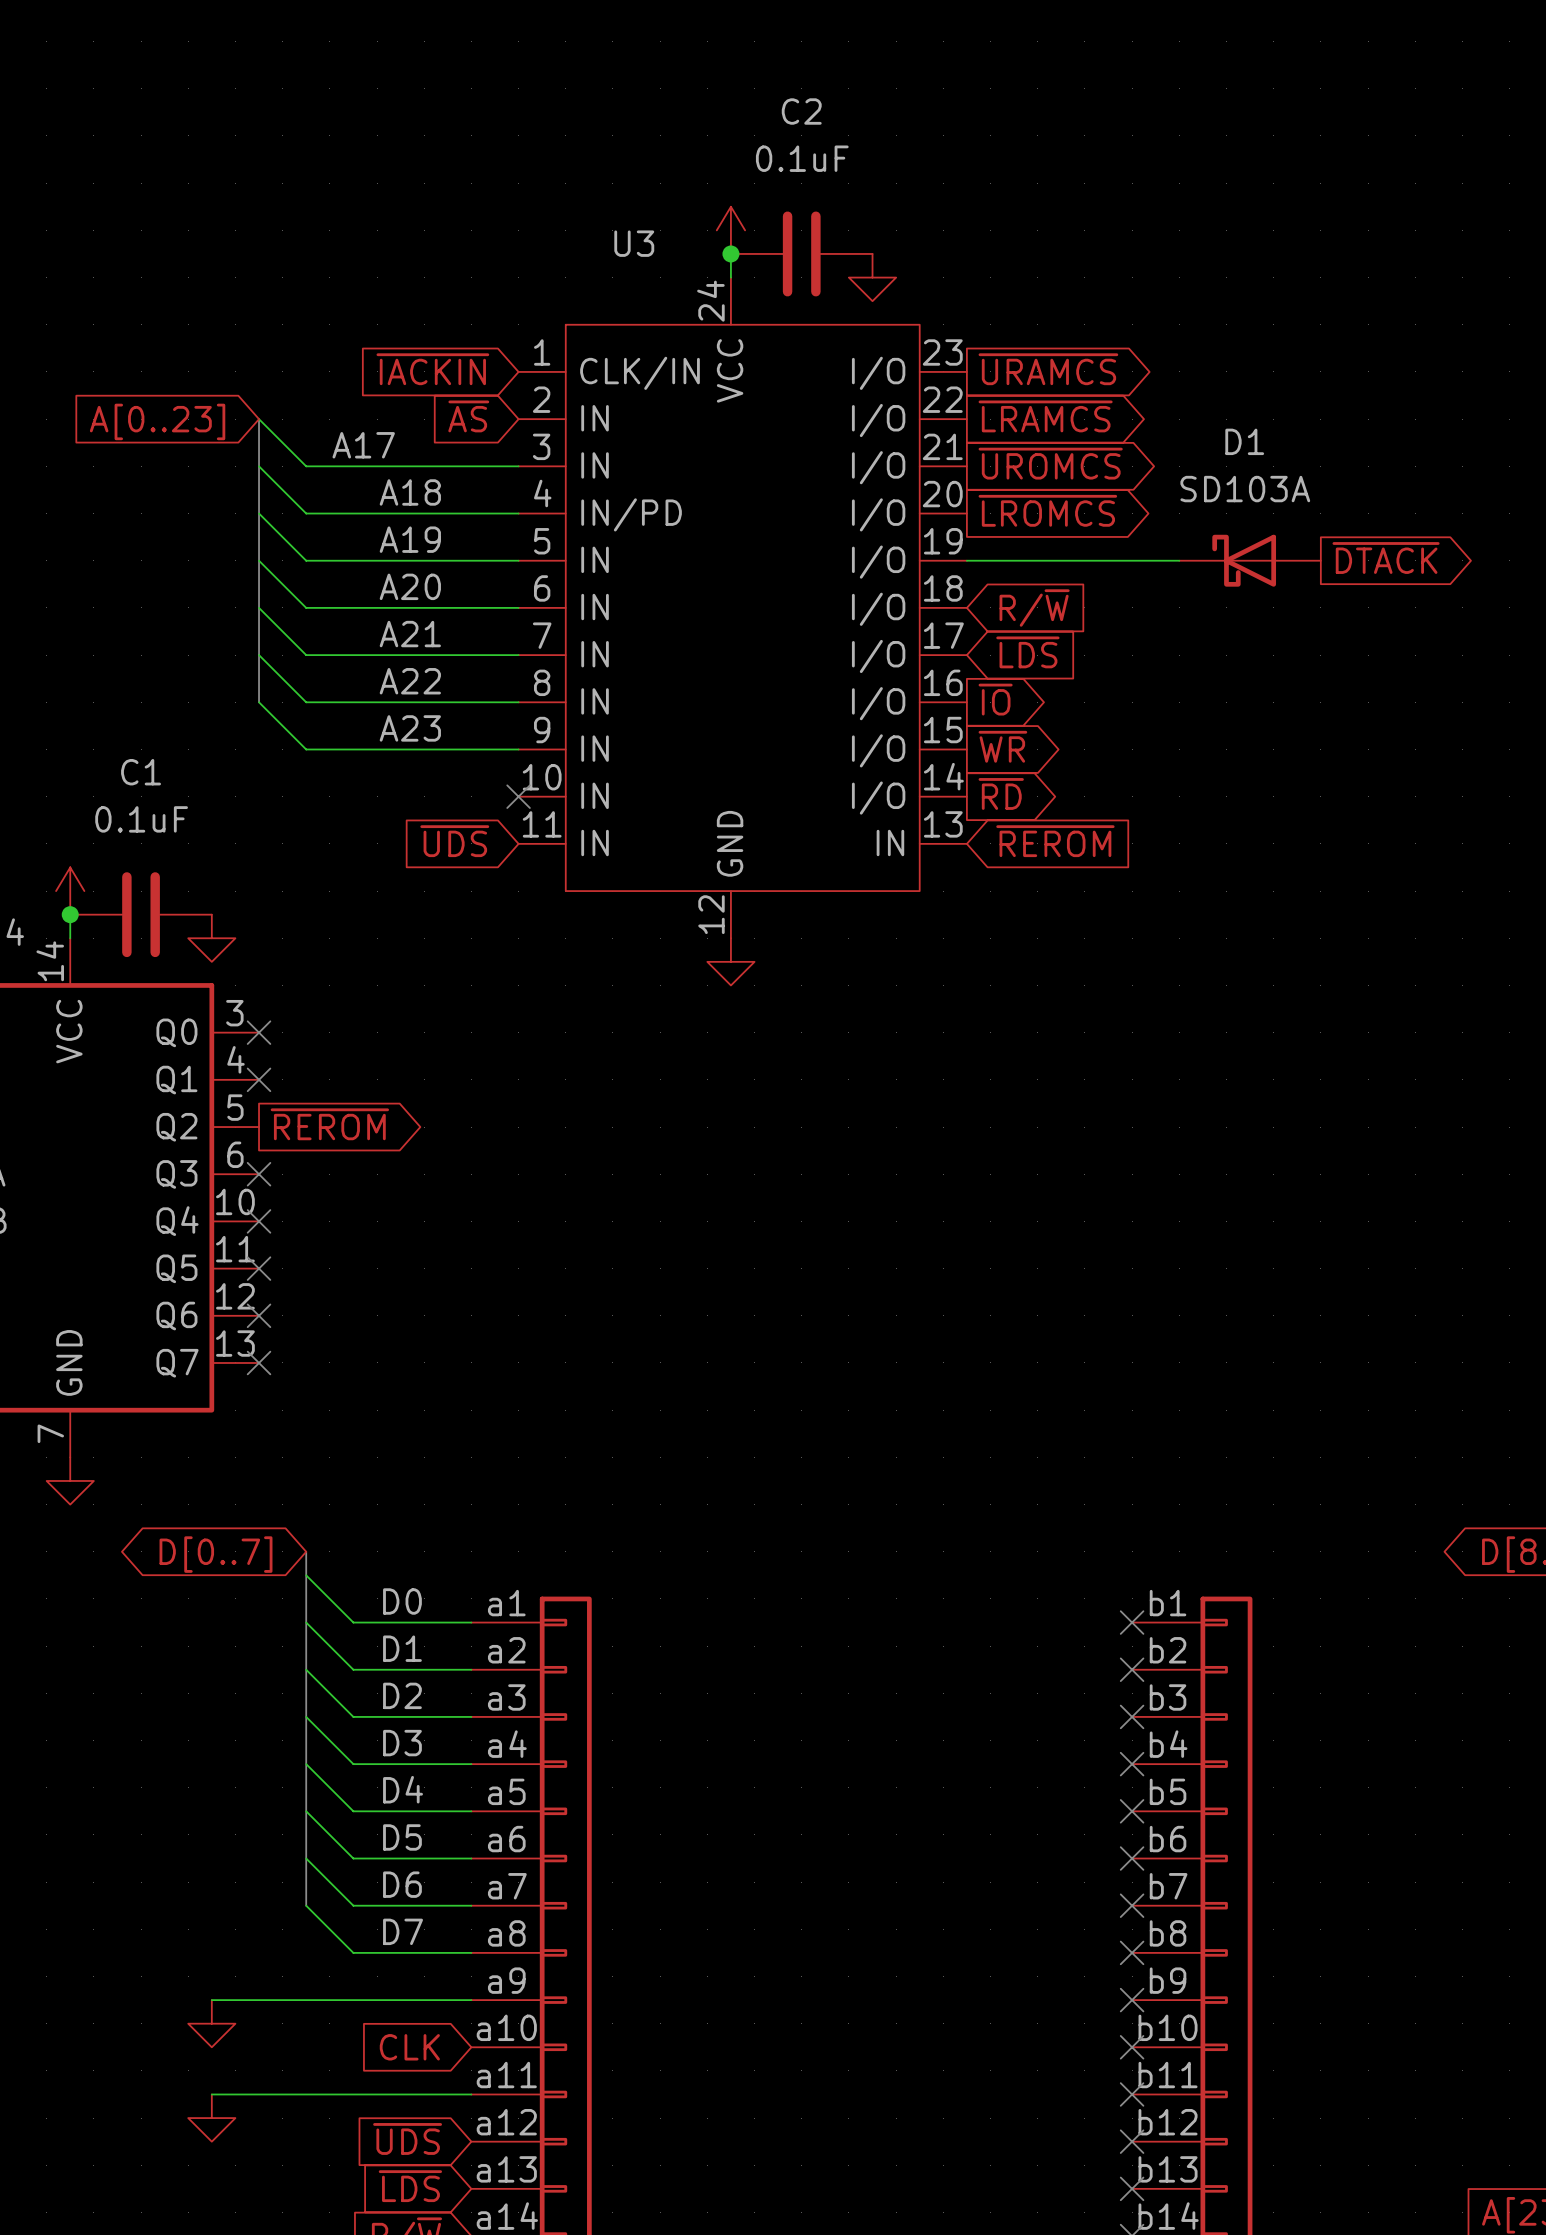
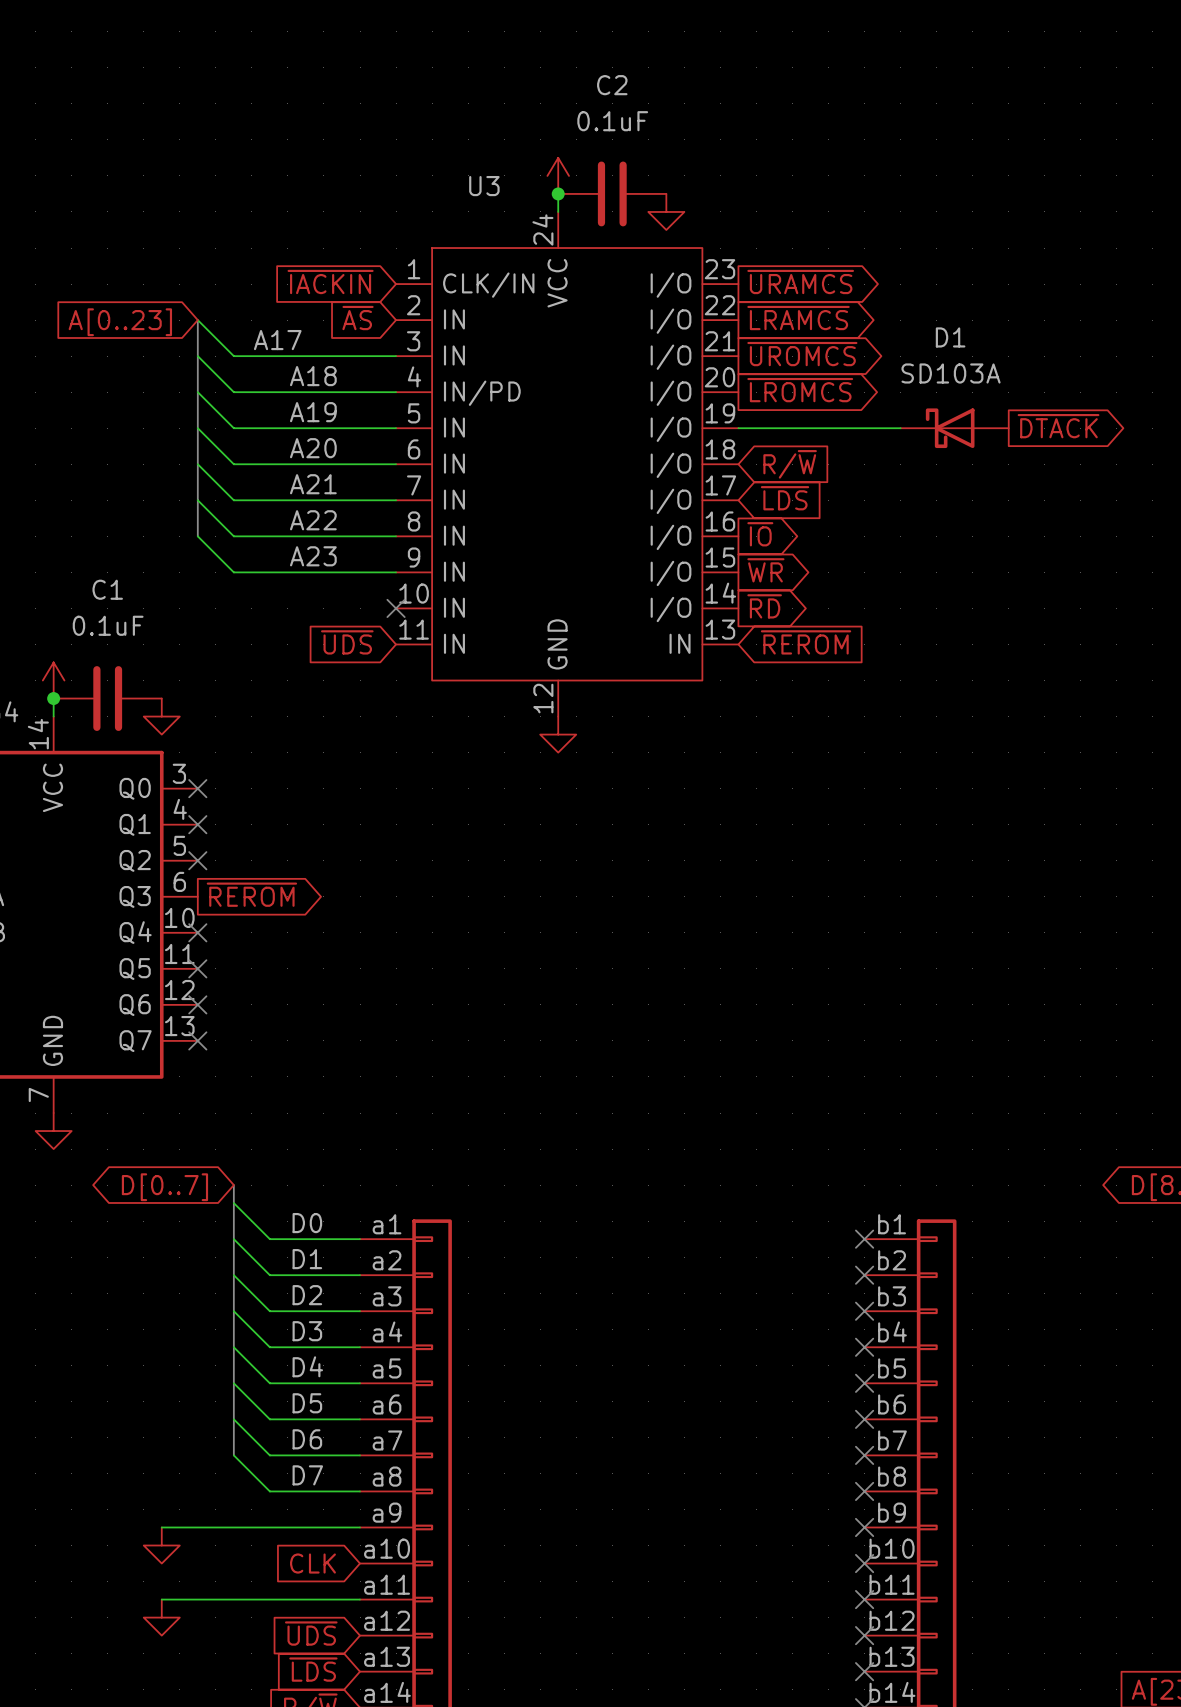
global label position: ~{REROM} (329, 1124) -> ~{REROM} (251, 894)
no-connect mark position: (259, 1174) -> (197, 860)

